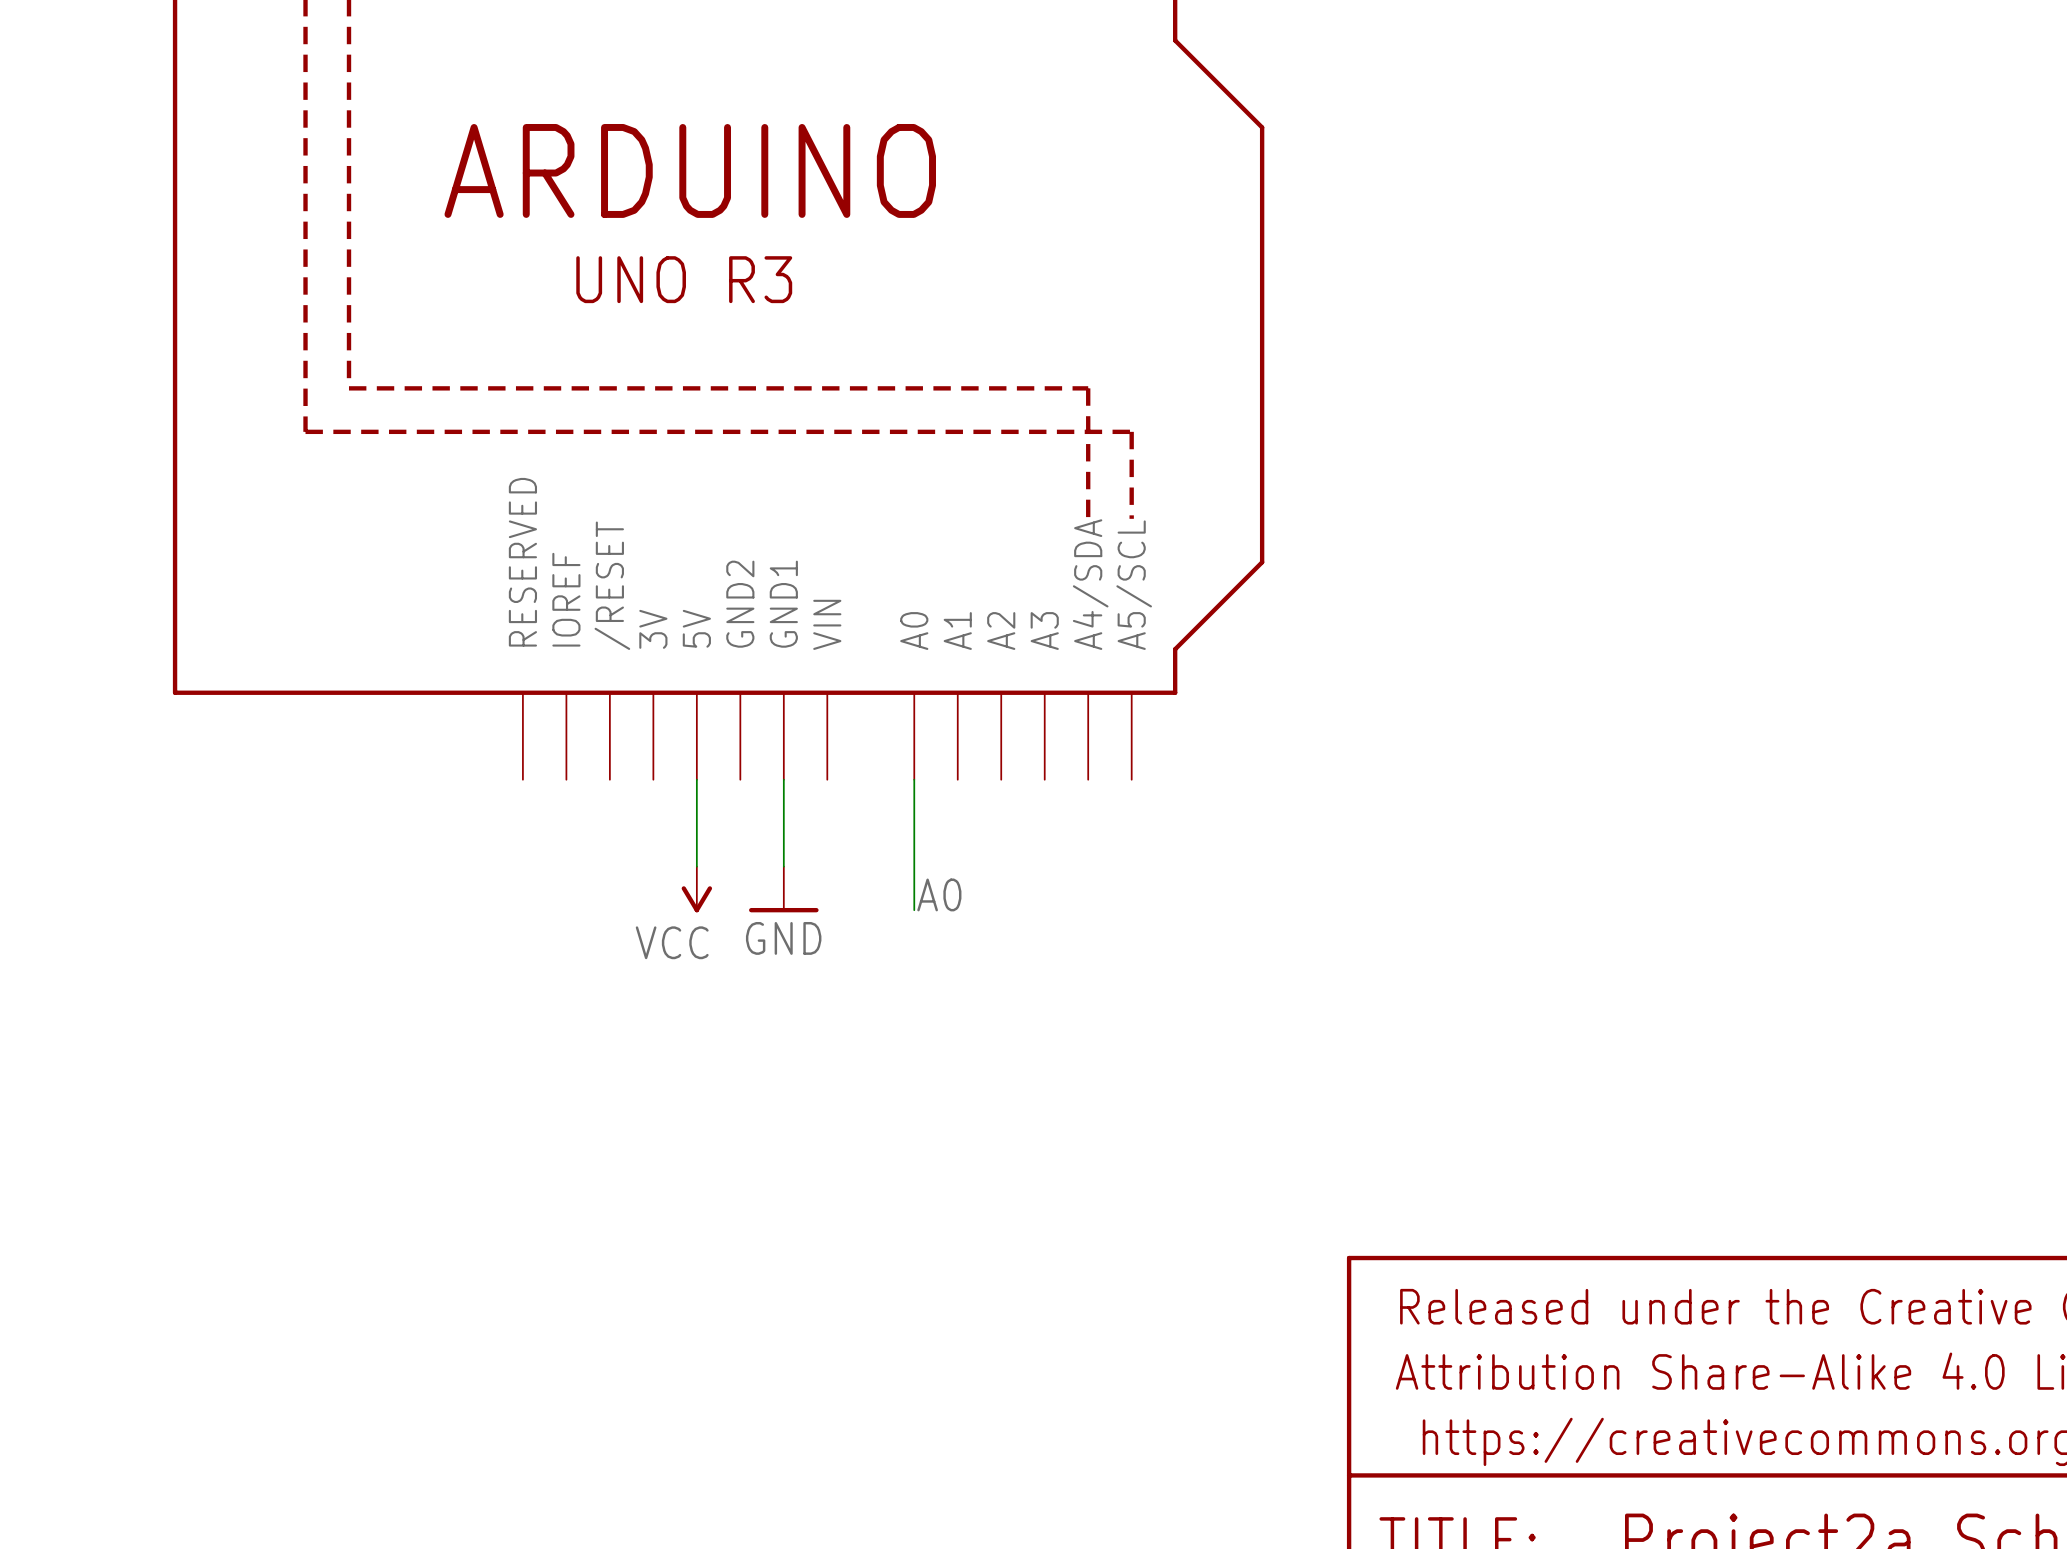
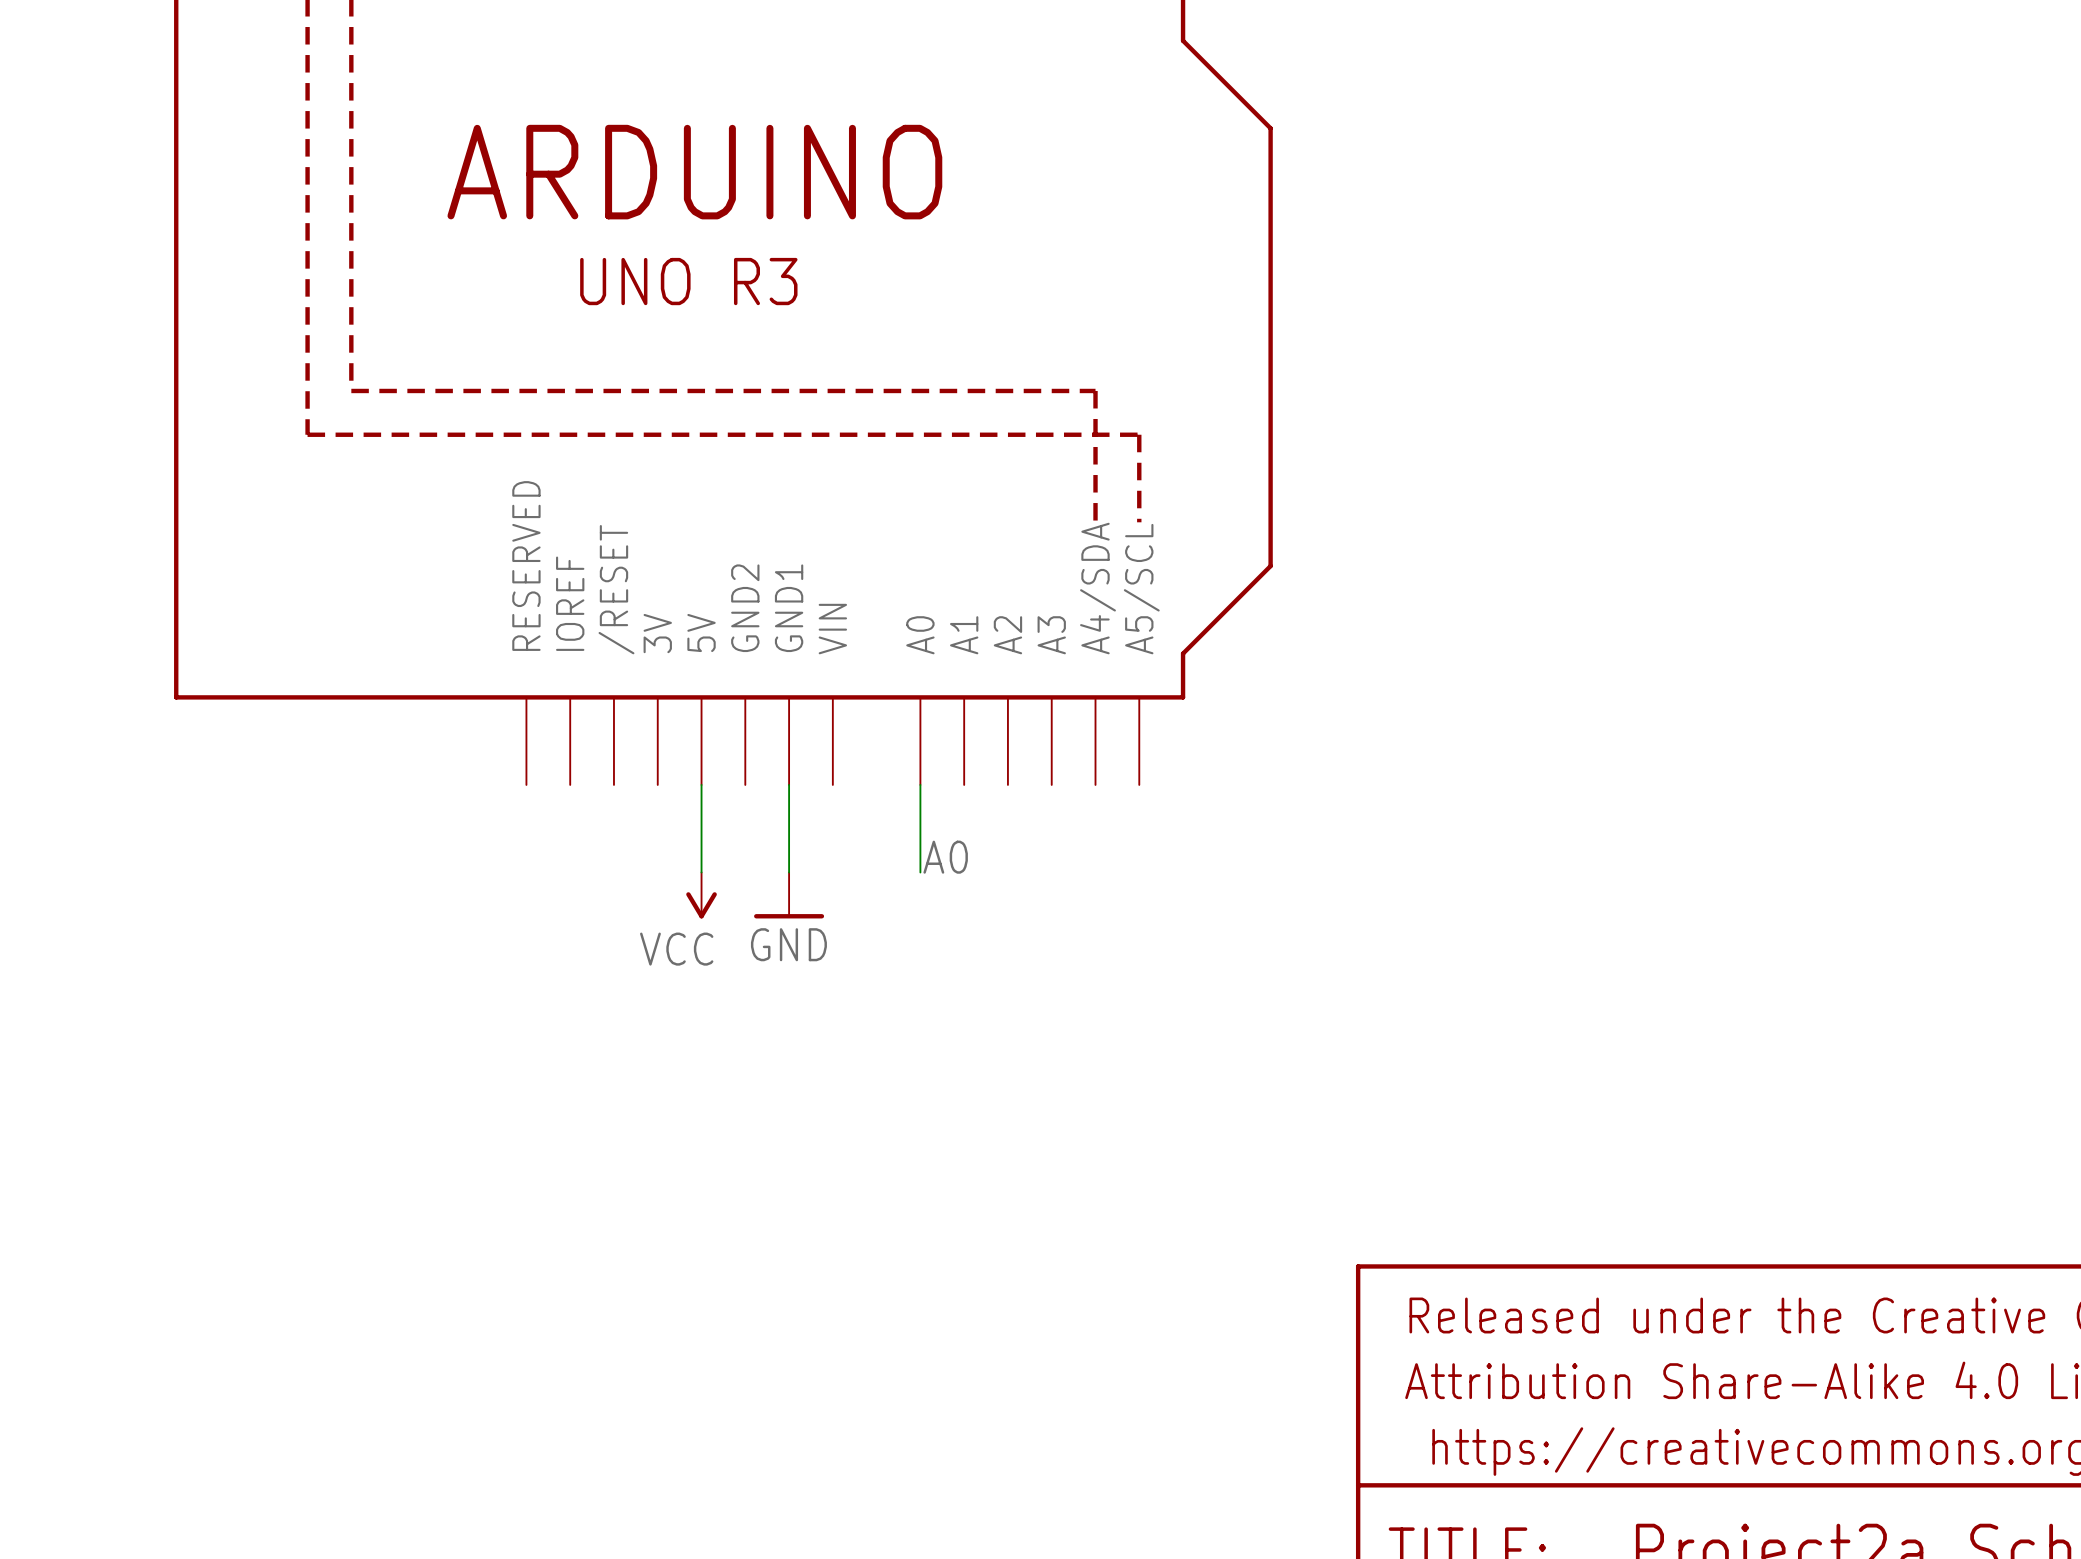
wire: (914, 866) (914, 910) -> none
label position: A0 (939, 894) -> A0 (945, 857)

